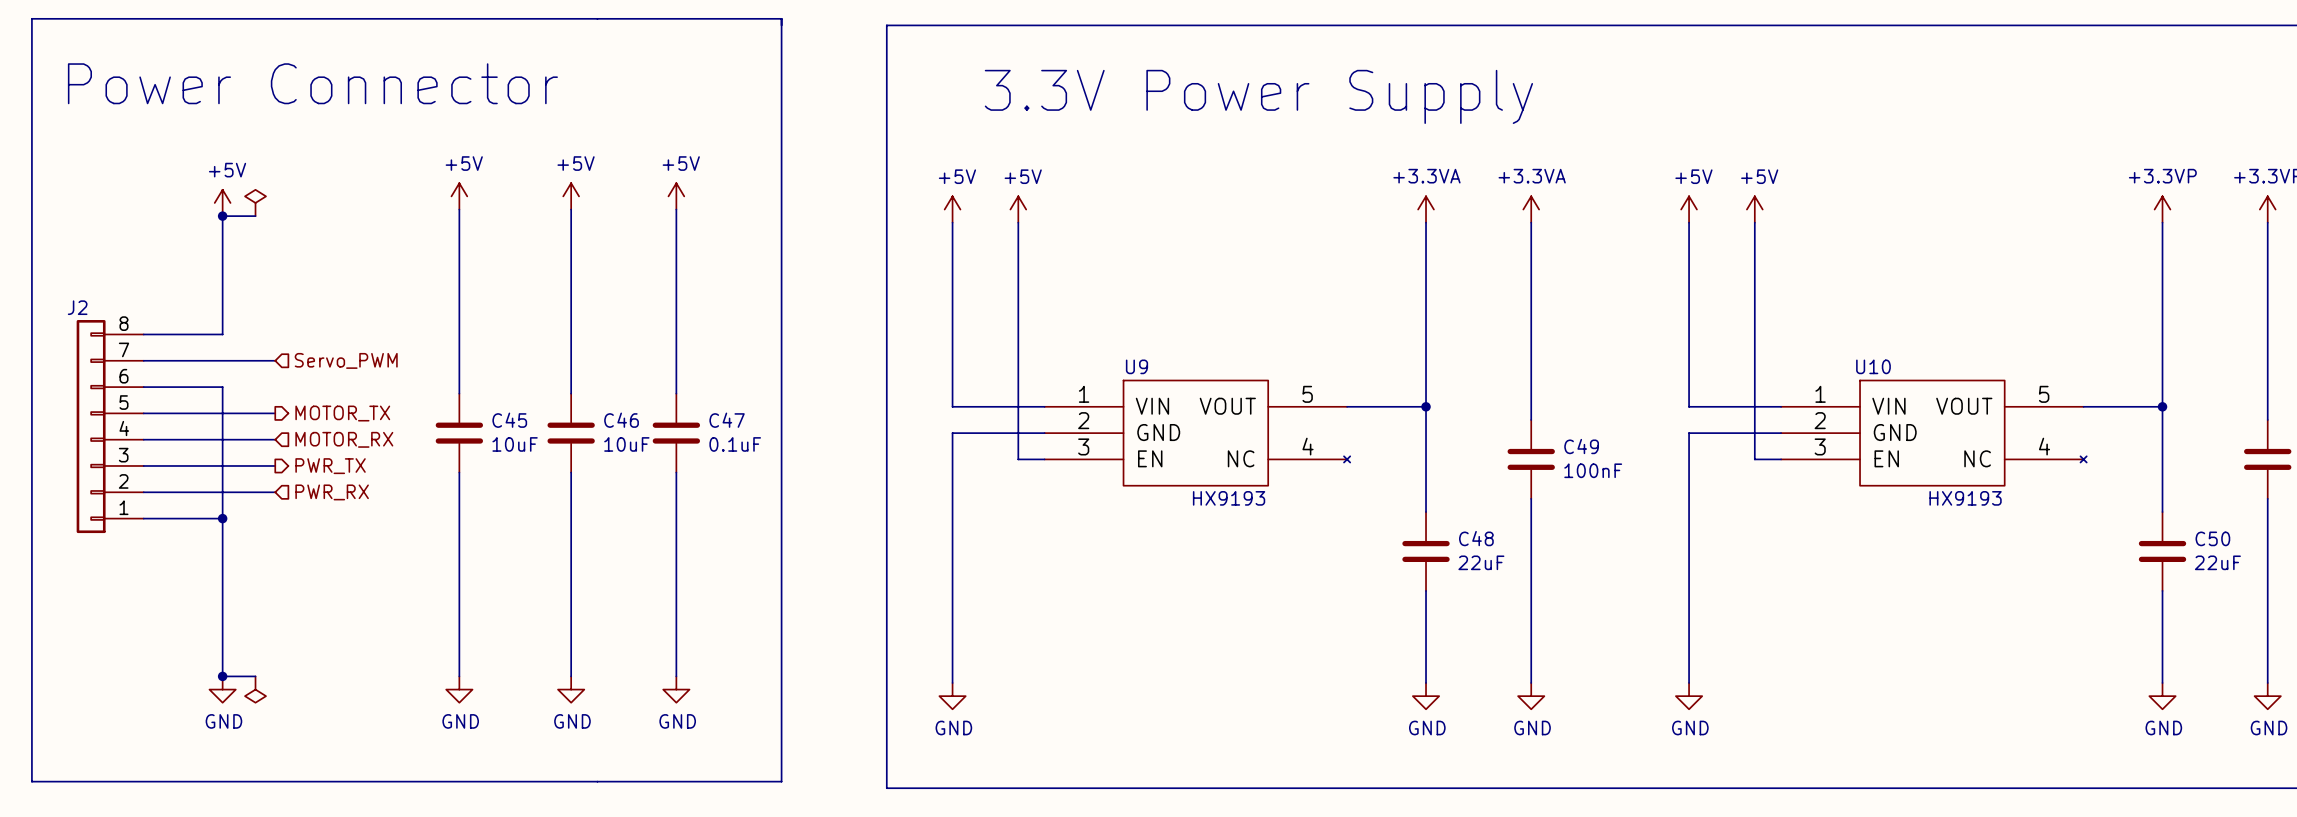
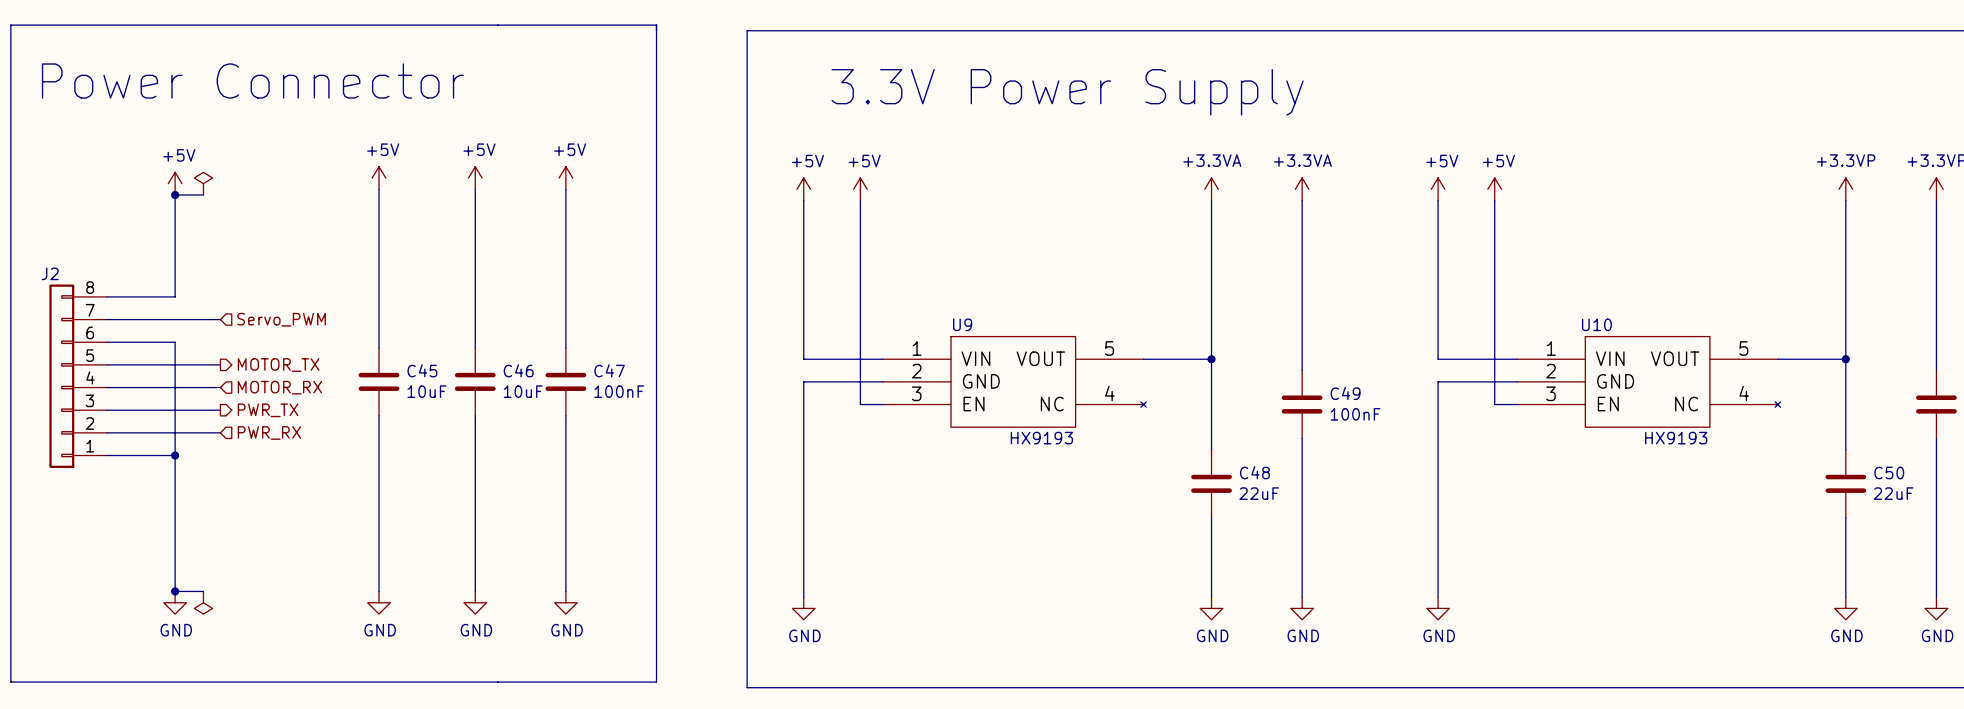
C47 value: 0.1uF (735, 444) -> 100nF (619, 391)

